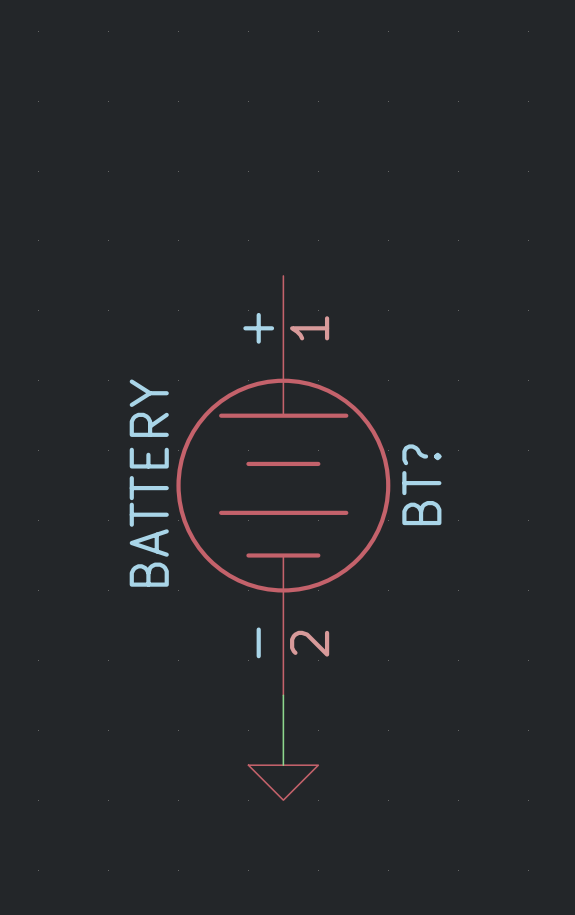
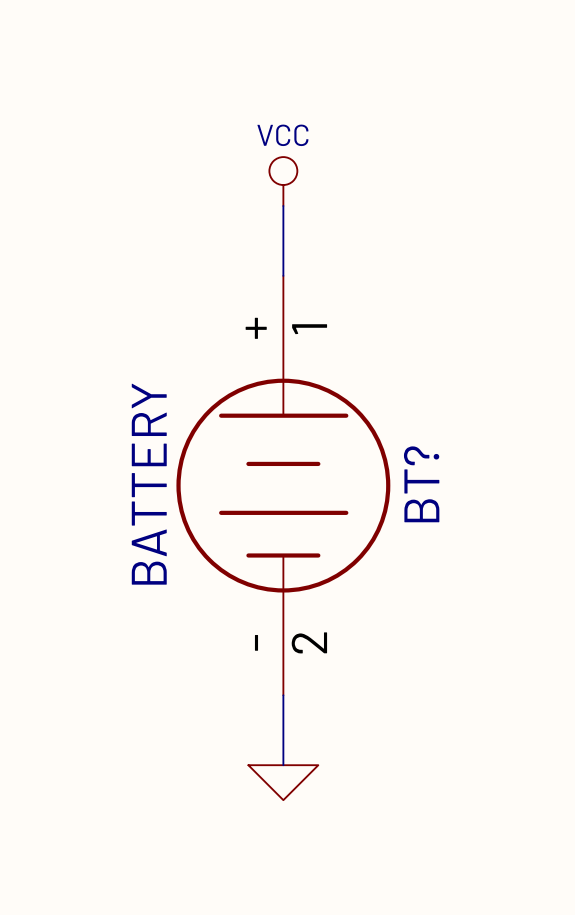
power symbol: none -> VCC (283, 181)
wire: none -> (283, 206) (283, 275)

